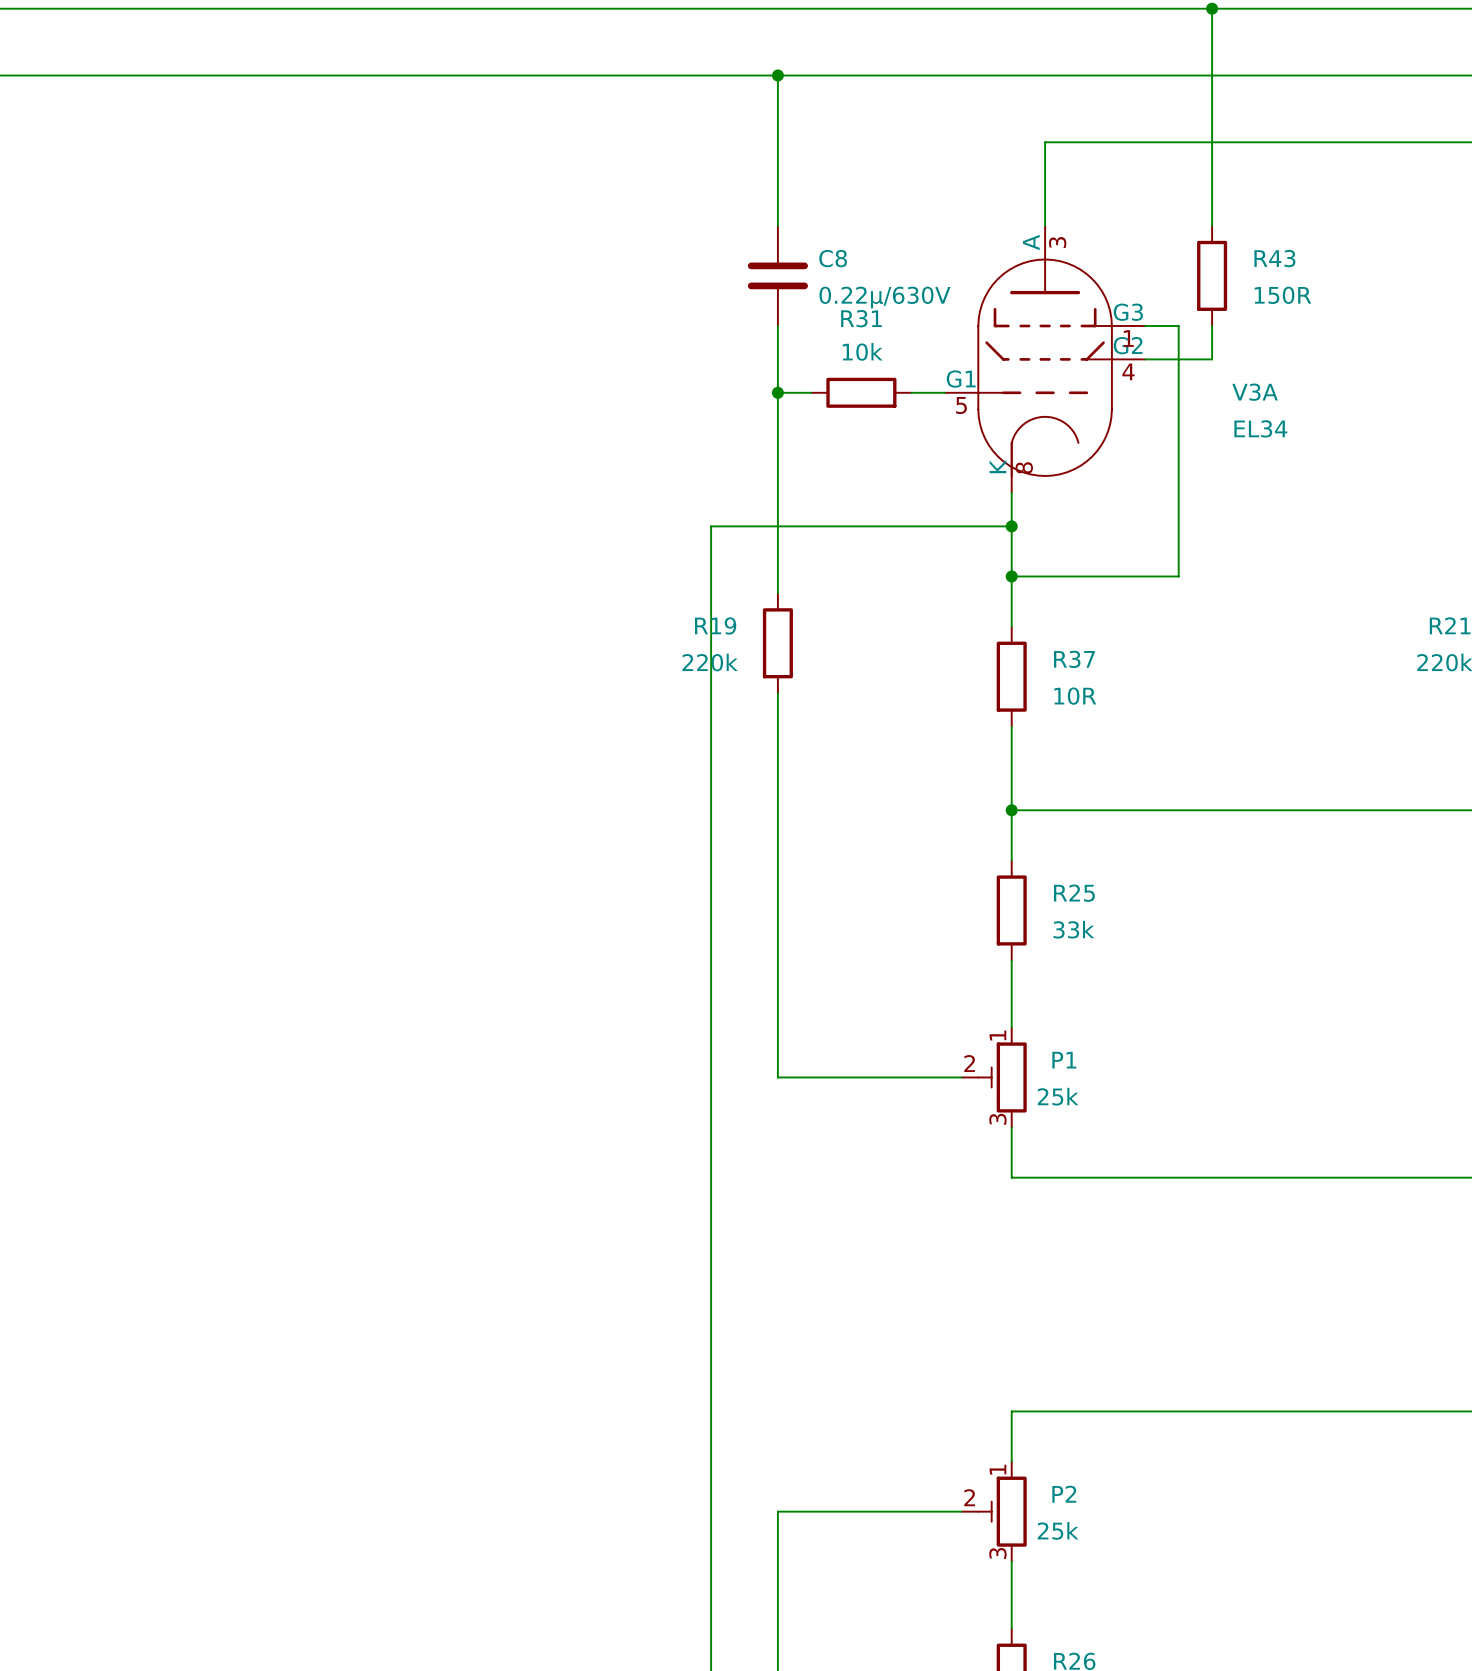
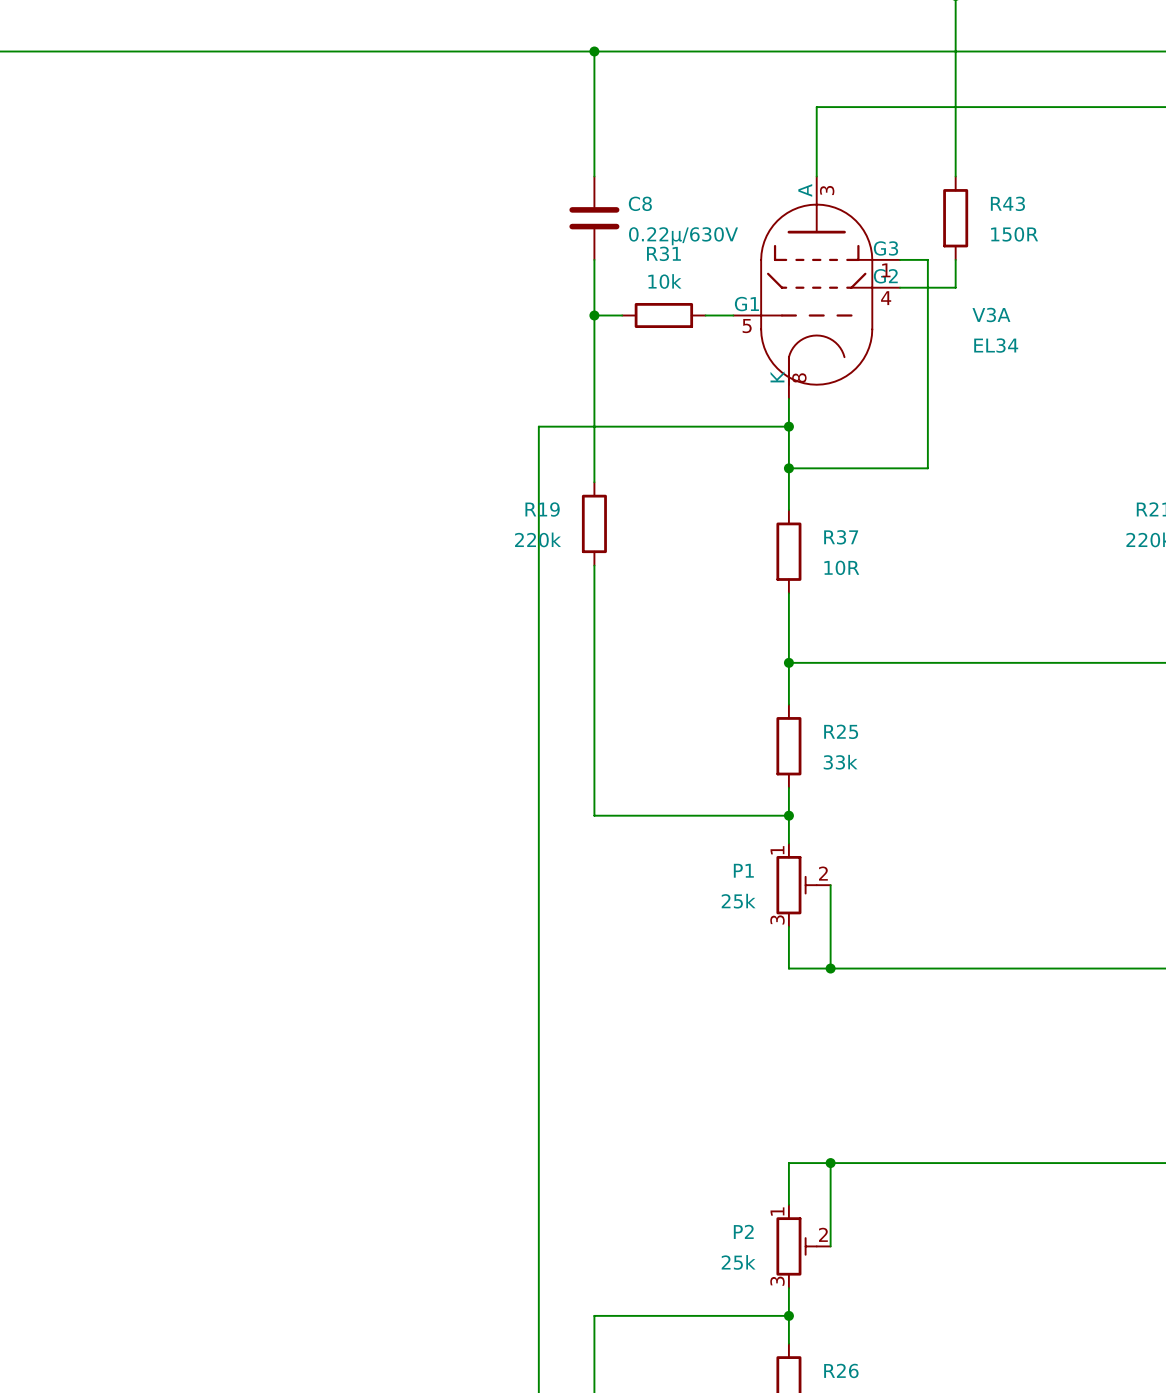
wire: (777, 993) (777, 1077) (961, 1077) -> (594, 815) (788, 815)
junction: none -> (788, 815)
P1 flip: as is (1002, 1077) -> left-right (796, 885)
wire: none -> (830, 885) (830, 968)
P1 value position: 25k (1058, 1096) -> 25k (738, 901)
junction: none -> (830, 968)
wire: none -> (830, 1163) (830, 1246)
junction: none -> (830, 1163)
wire: (961, 1511) (777, 1511) (777, 1595) -> (788, 1315) (594, 1315)
P2 flip: as is (1002, 1511) -> left-right (796, 1246)
P2 value position: 25k (1058, 1530) -> 25k (738, 1262)
junction: none -> (788, 1315)

